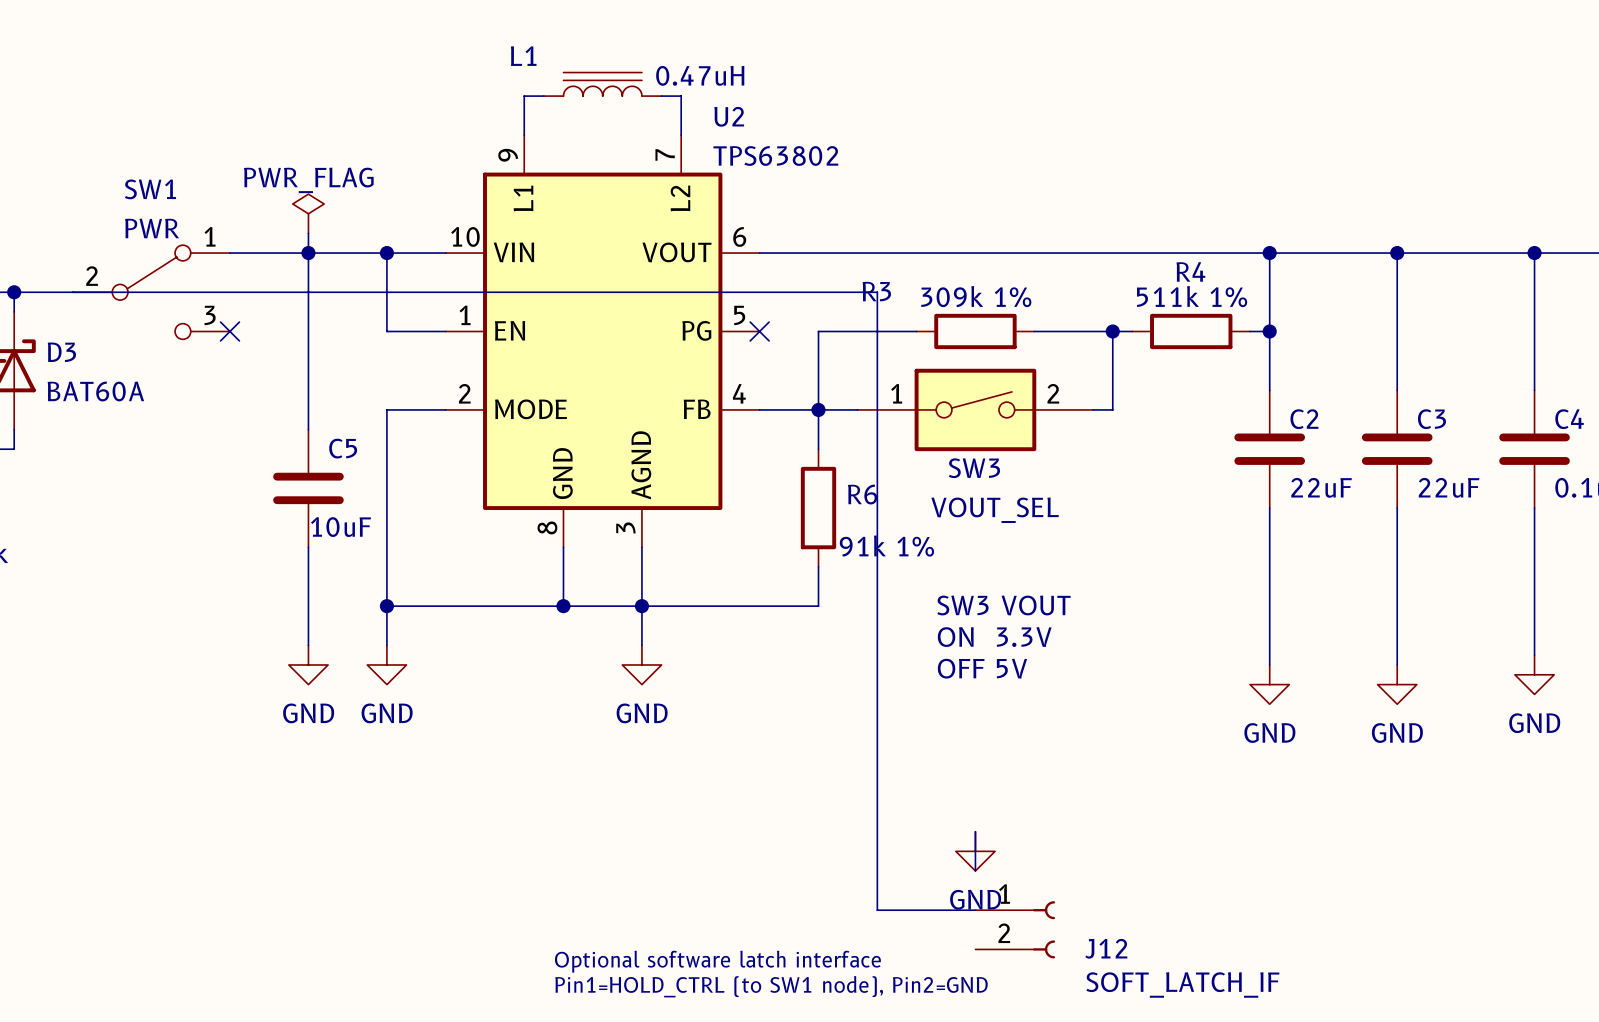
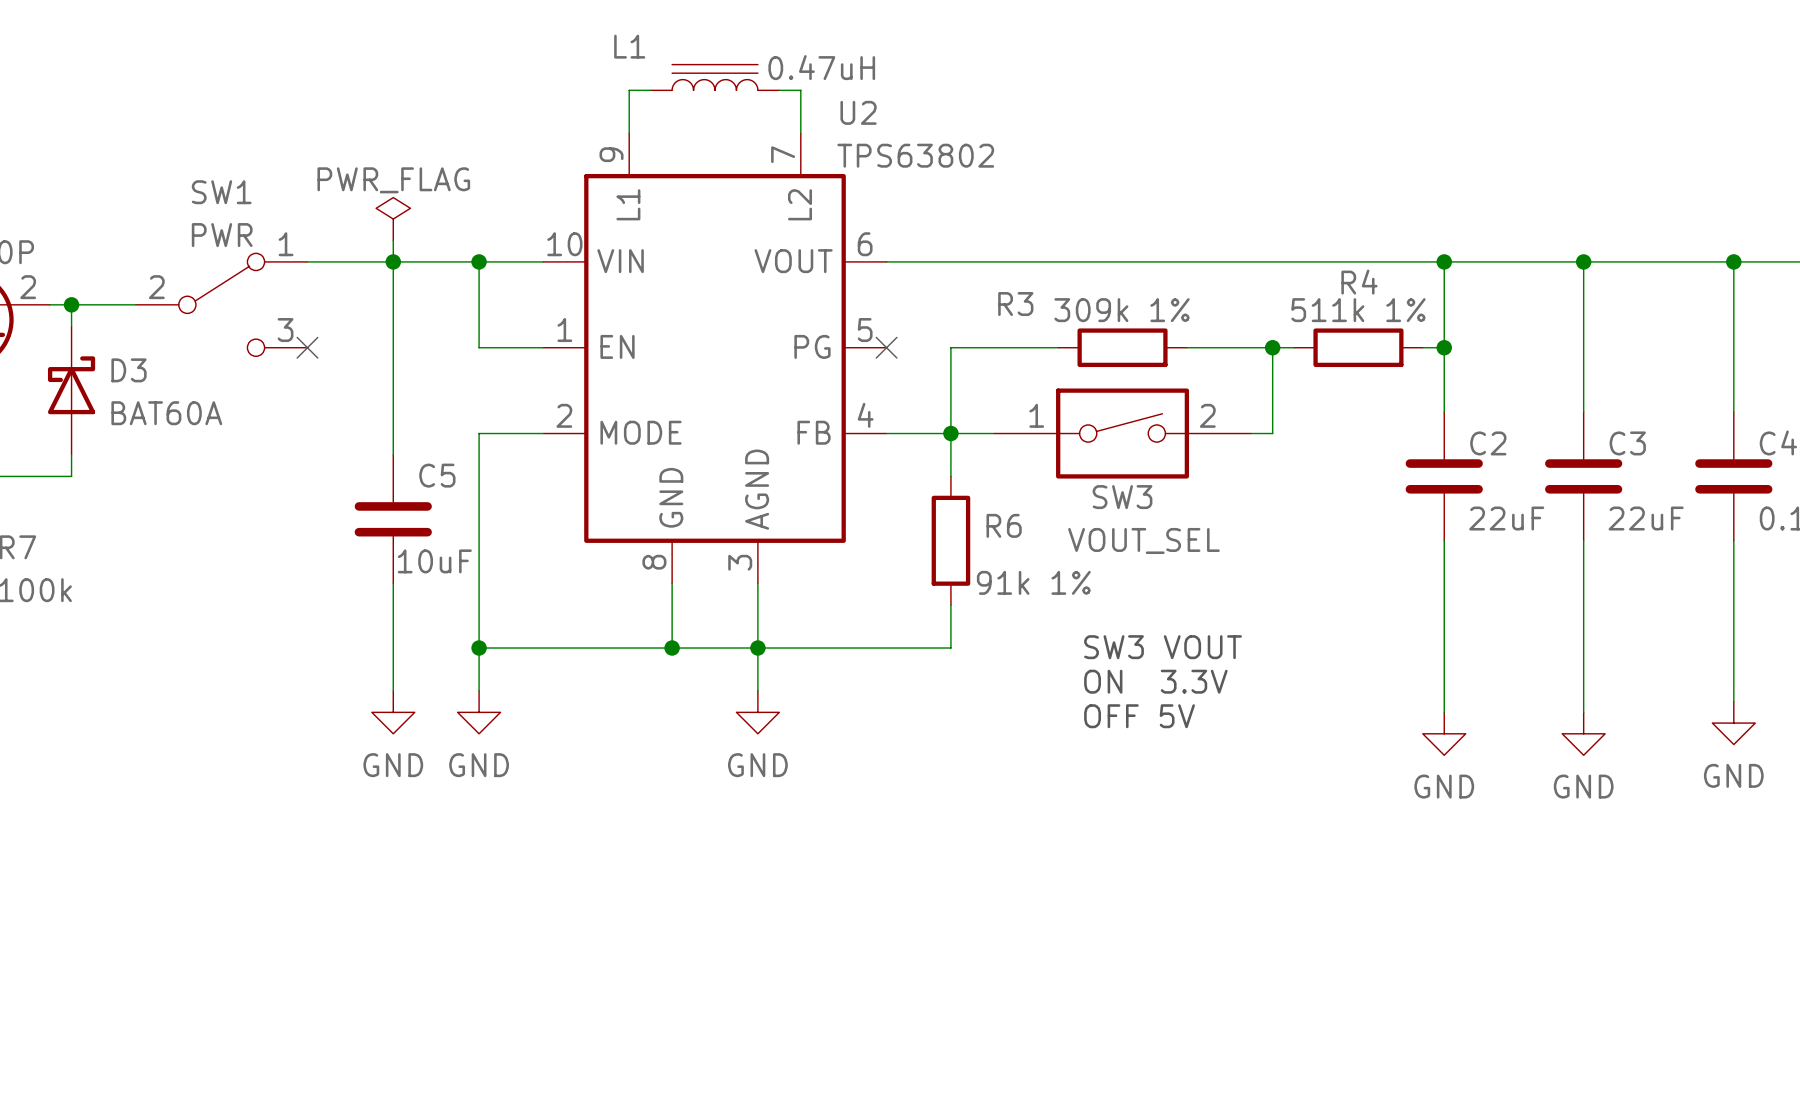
wire: (73, 292) (877, 292) (877, 910) (975, 910) -> none
wire: (975, 831) (975, 870) -> none
power symbol: GND (975, 851) -> none
J12: SOFT_LATCH_IF (1015, 929) -> none
text: Optional software latch interface (717, 961) -> none
text: Pin1=HOLD_CTRL (to SW1 node), Pin2=GND (771, 986) -> none

